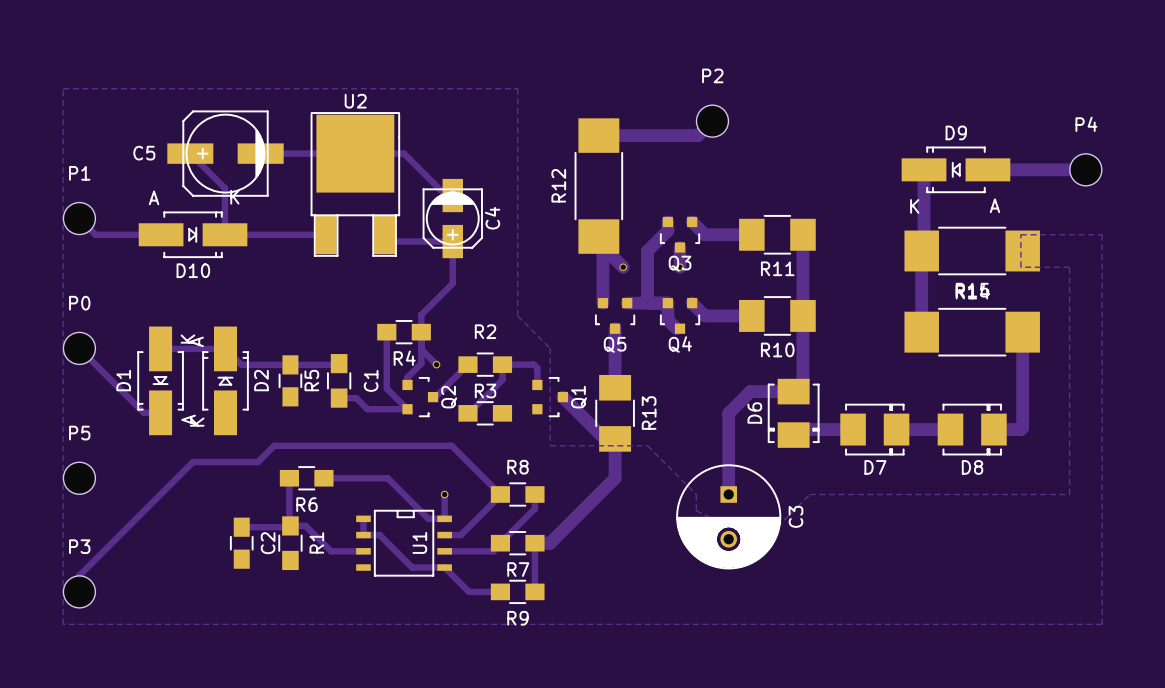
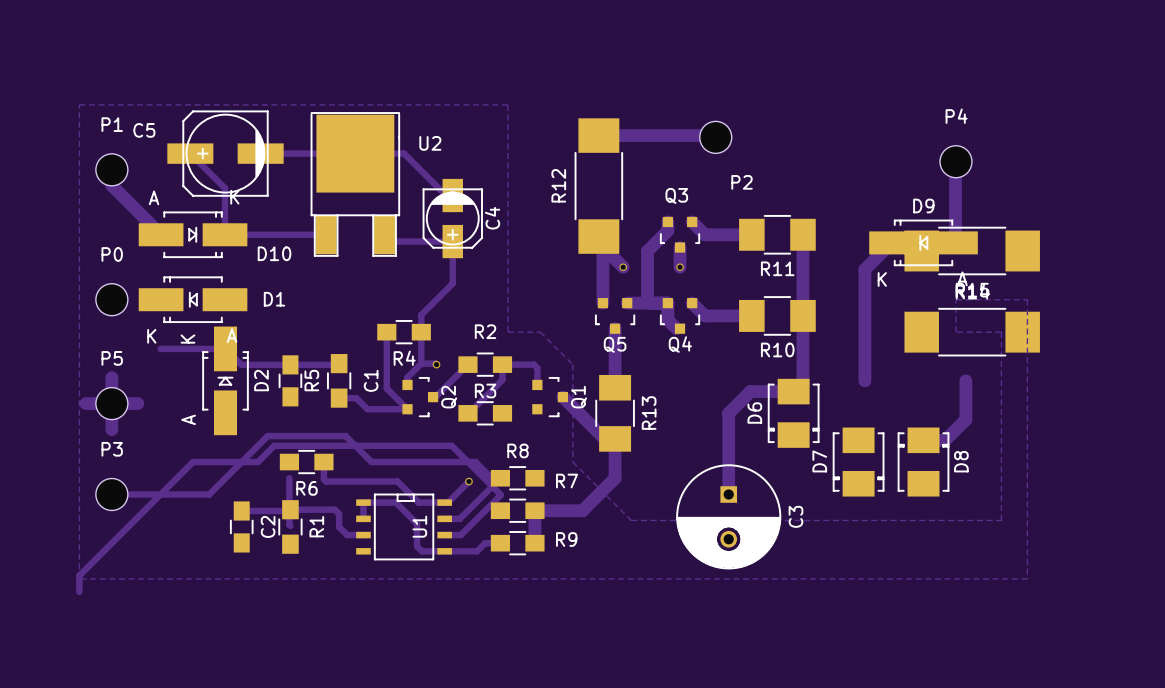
P2 name position: P2 (712, 75) -> P2 (742, 182)
zone outline: (63, 88) (63, 624) (1102, 624) (1102, 234) (1020, 234) (1020, 267) (1069, 267) (1069, 494) (809, 494) (777, 526) (728, 526) (696, 510) (696, 494) (647, 445) (550, 445) (550, 348) (517, 315) (517, 88) (63, 88) -> (79, 104) (79, 578) (1027, 578) (1027, 299) (955, 299) (955, 332) (1001, 332) (1001, 520) (631, 520) (572, 462) (572, 364) (540, 332) (507, 332) (507, 104) (79, 104)
U2 name position: U2 (355, 101) -> U2 (430, 143)
P2 position: (712, 121) -> (715, 137)
C5 name position: C5 (144, 153) -> C5 (144, 130)
track: none -> (955, 156) (955, 242)
track: (924, 169) (921, 332) -> none
D9 position: (955, 169) -> (923, 242)
track: (987, 169) (1085, 169) -> none
P4 position: (1085, 169) -> (955, 161)
track: (79, 218) (95, 234) (161, 234) -> (111, 169) (111, 185) (161, 234)
P1 position: (79, 218) -> (111, 169)
track: none -> (891, 242) (864, 269) (864, 380)
Q3 name position: Q3 (680, 263) -> Q3 (676, 195)
D10 name position: D10 (193, 270) -> D10 (274, 253)
track: (1020, 330) (1022, 332) (1022, 427) (1020, 429) (993, 429) -> none
track: (79, 348) (143, 412) (160, 412) -> none
P0 position: (79, 348) -> (111, 299)
track: (421, 349) (435, 363) -> (421, 363) (435, 363)
track: none -> (111, 377) (111, 429)
track: none -> (964, 379) (965, 380) (965, 419) (945, 440) (923, 440)
D1 name position: D1 (123, 380) -> D1 (274, 299)
D1 rotation: 0° (160, 380) -> 90° clockwise (193, 299)
D1 position: (160, 380) -> (193, 299)
track: none -> (85, 403) (137, 403)
track: (799, 429) (853, 429) -> none
D7 rotation: 0° (874, 429) -> 90° clockwise (858, 462)
track: (896, 429) (950, 429) -> none
D8 rotation: 0° (972, 429) -> 90° counterclockwise (923, 462)
D8 position: (972, 429) -> (923, 462)
track: none -> (323, 462) (323, 479) (326, 481) (397, 481) (418, 502) (447, 502) (468, 481)
P5 position: (79, 478) -> (111, 403)
R6 position: (306, 478) -> (306, 462)
track: (323, 478) (387, 478) (428, 518) (444, 518) (444, 494) -> none
track: none -> (111, 494) (209, 494) (267, 436) (345, 436) (371, 462) (475, 462) (491, 478) (500, 478) (459, 518) (444, 518)
via position: (444, 494) -> (468, 481)
R8 position: (517, 494) -> (517, 478)
track: (534, 494) (534, 508) (493, 551) (477, 551) -> (500, 543) (485, 543) (477, 551)
track: none -> (241, 510) (334, 509) (339, 513) (339, 526) (347, 535) (363, 535)
R7: none -> (517, 510)
track: (582, 510) (550, 543) (534, 543) (534, 591) -> (582, 510) (534, 510) (534, 543)
track: (363, 518) (363, 535) (379, 535) (412, 567) (444, 567) (468, 591) (500, 591) -> (363, 518) (363, 502) (395, 502) (417, 523) (417, 546) (421, 551) (444, 551)
track: (241, 527) (305, 525) (331, 551) (363, 551) -> none
C2 position: (241, 543) -> (241, 526)
R1 position: (290, 543) -> (290, 526)
U1 position: (404, 543) -> (404, 526)
R7 name: R7 (518, 569) -> R9 (566, 539)
P3 position: (79, 591) -> (111, 494)
R9: (517, 591) -> none

